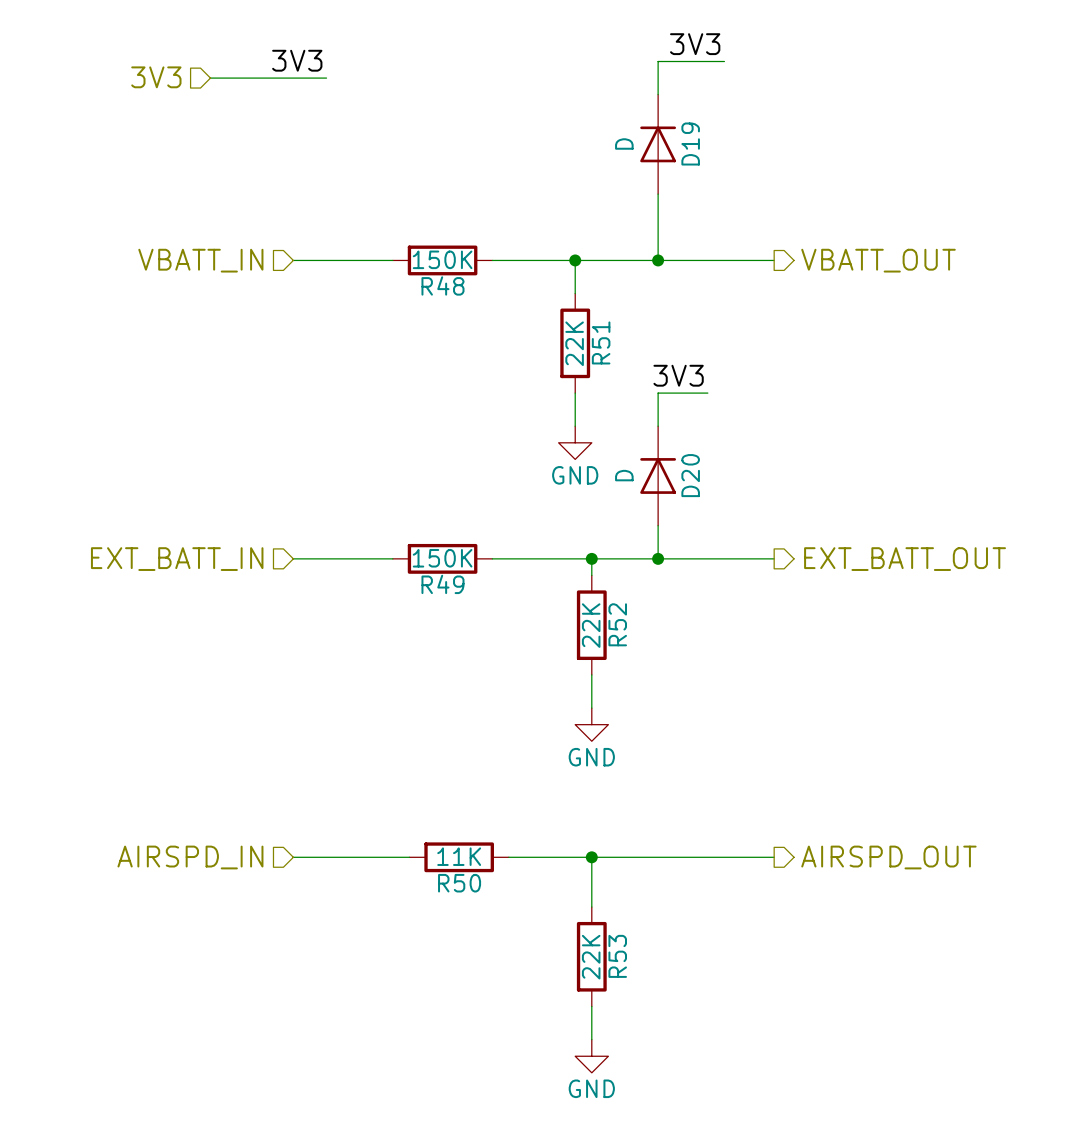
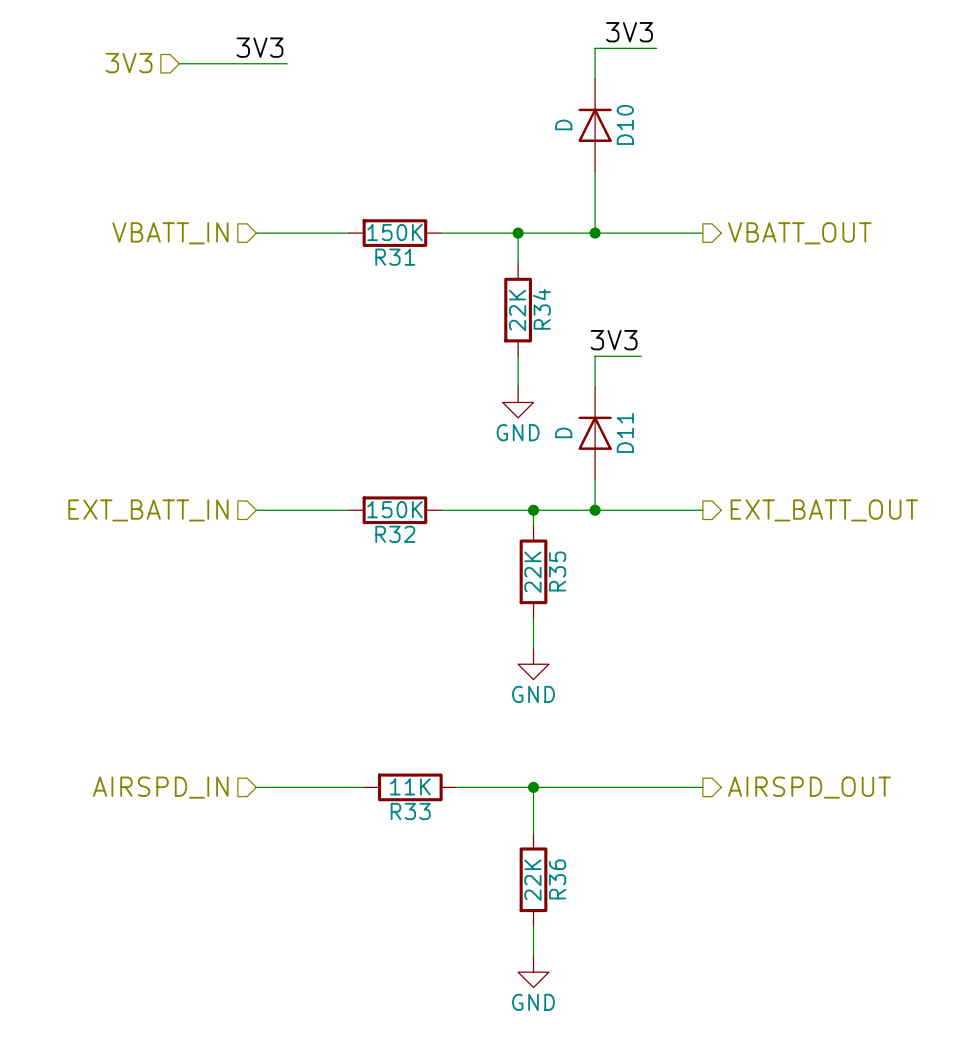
D19 name: D19 (690, 144) -> D10 (625, 124)
R48 name: R48 (442, 285) -> R31 (395, 257)
R51 name: R51 (601, 342) -> R34 (541, 309)
D20 name: D20 (690, 475) -> D11 (625, 432)
R49 name: R49 (442, 584) -> R32 (395, 534)
R52 name: R52 (617, 624) -> R35 (557, 571)
R50 name: R50 (459, 883) -> R33 (410, 811)
R53 name: R53 (617, 956) -> R36 (557, 879)

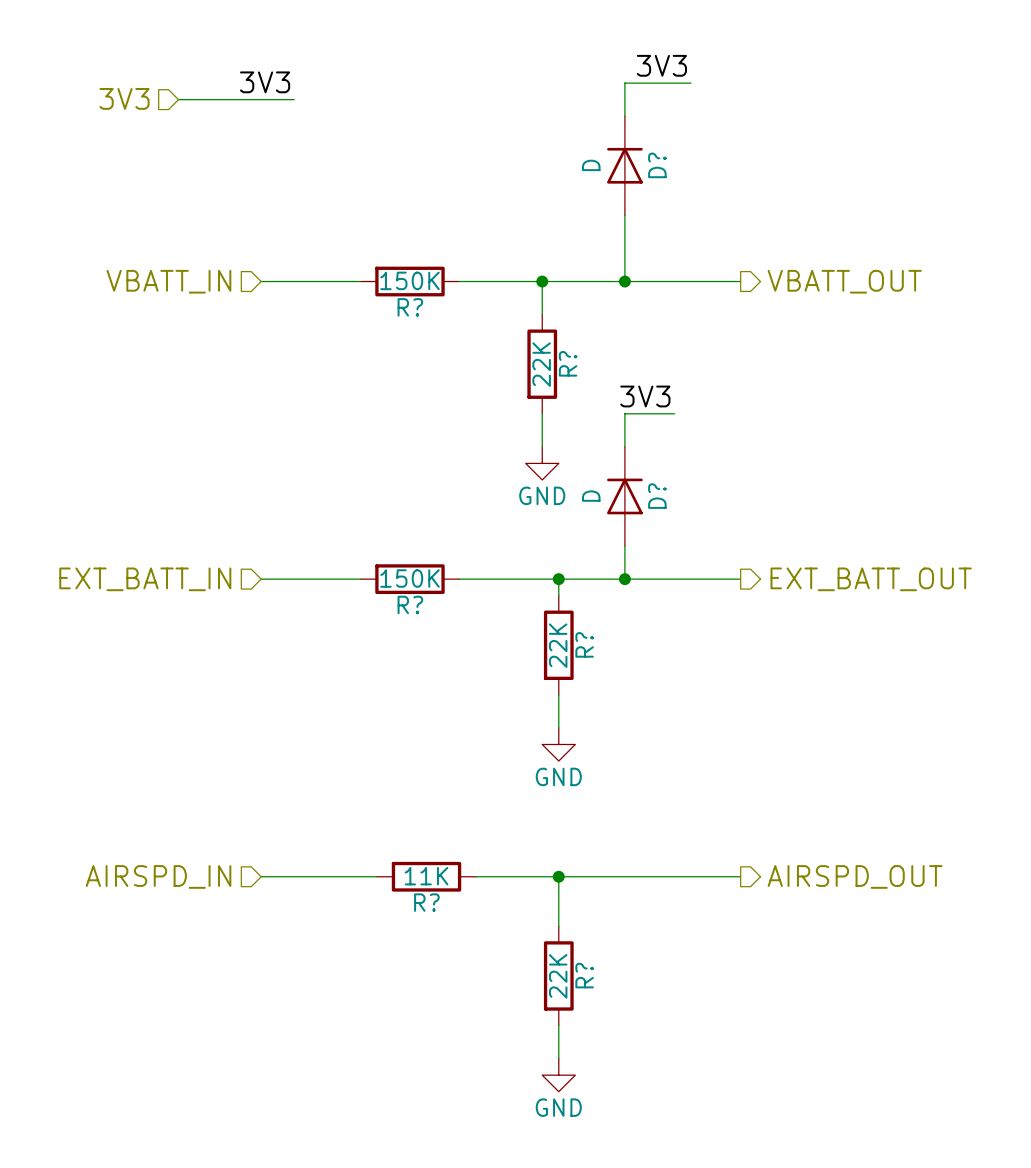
D10 name: D10 (625, 124) -> D? (657, 165)
R31 name: R31 (395, 257) -> R? (410, 307)
R34 name: R34 (541, 309) -> R? (568, 363)
D11 name: D11 (625, 432) -> D? (657, 496)
R32 name: R32 (395, 534) -> R? (410, 604)
R35 name: R35 (557, 571) -> R? (584, 644)
R33 name: R33 (410, 811) -> R? (426, 902)
R36 name: R36 (557, 879) -> R? (584, 975)

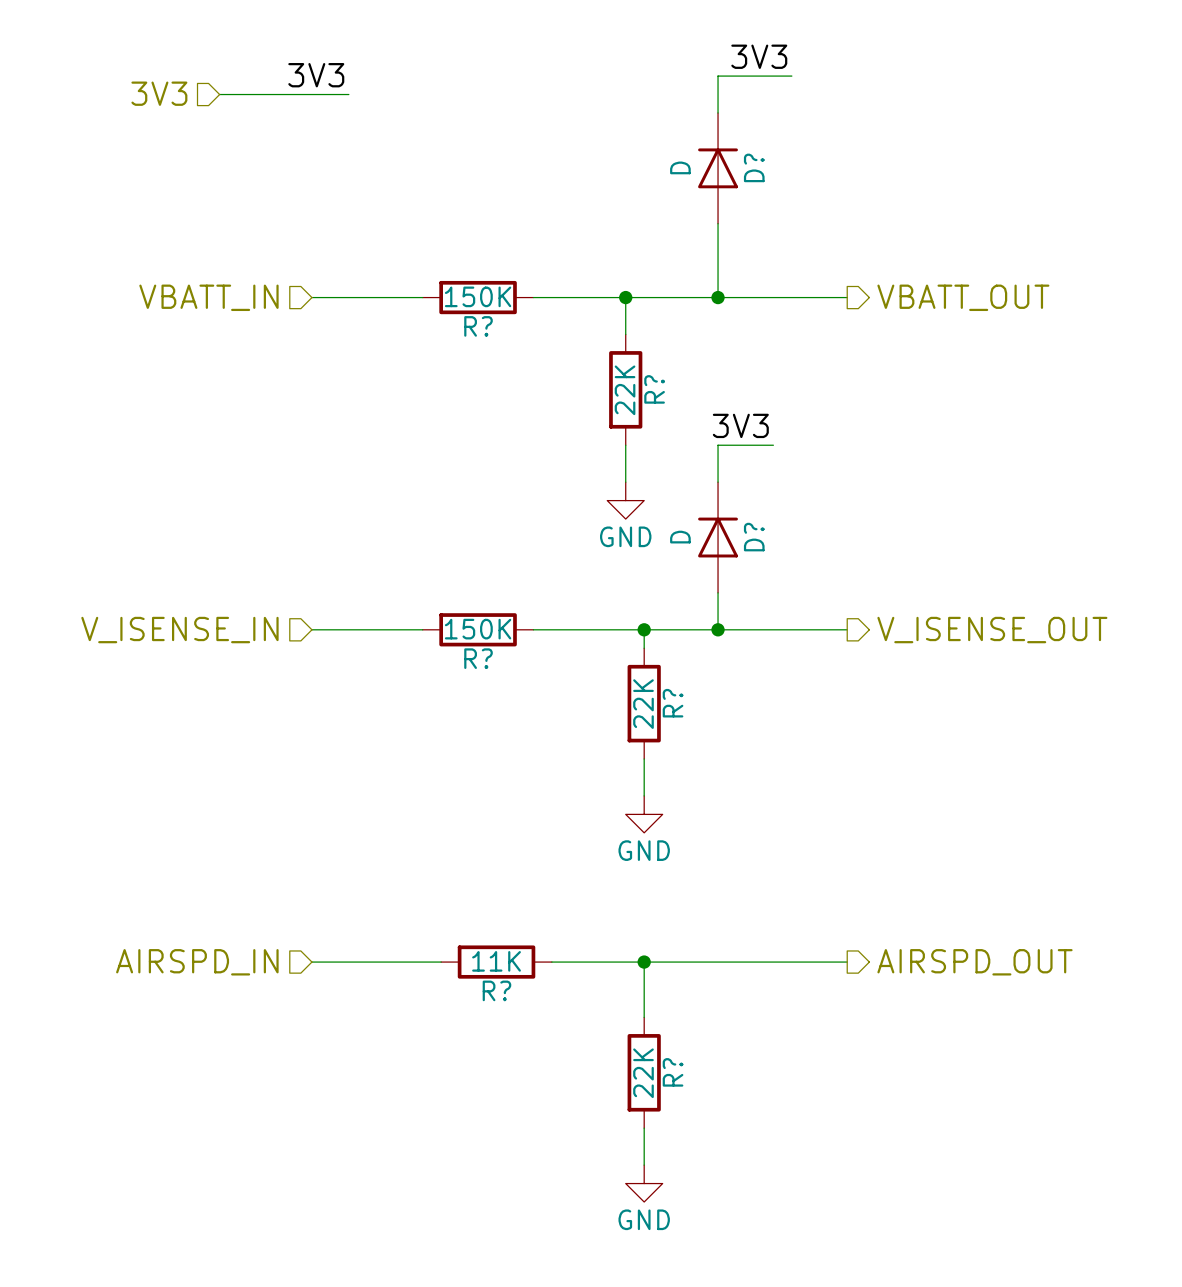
hierarchical label: EXT_BATT_IN (145, 579) -> V_ISENSE_IN (179, 630)
hierarchical label: EXT_BATT_OUT (871, 579) -> V_ISENSE_OUT (992, 630)

